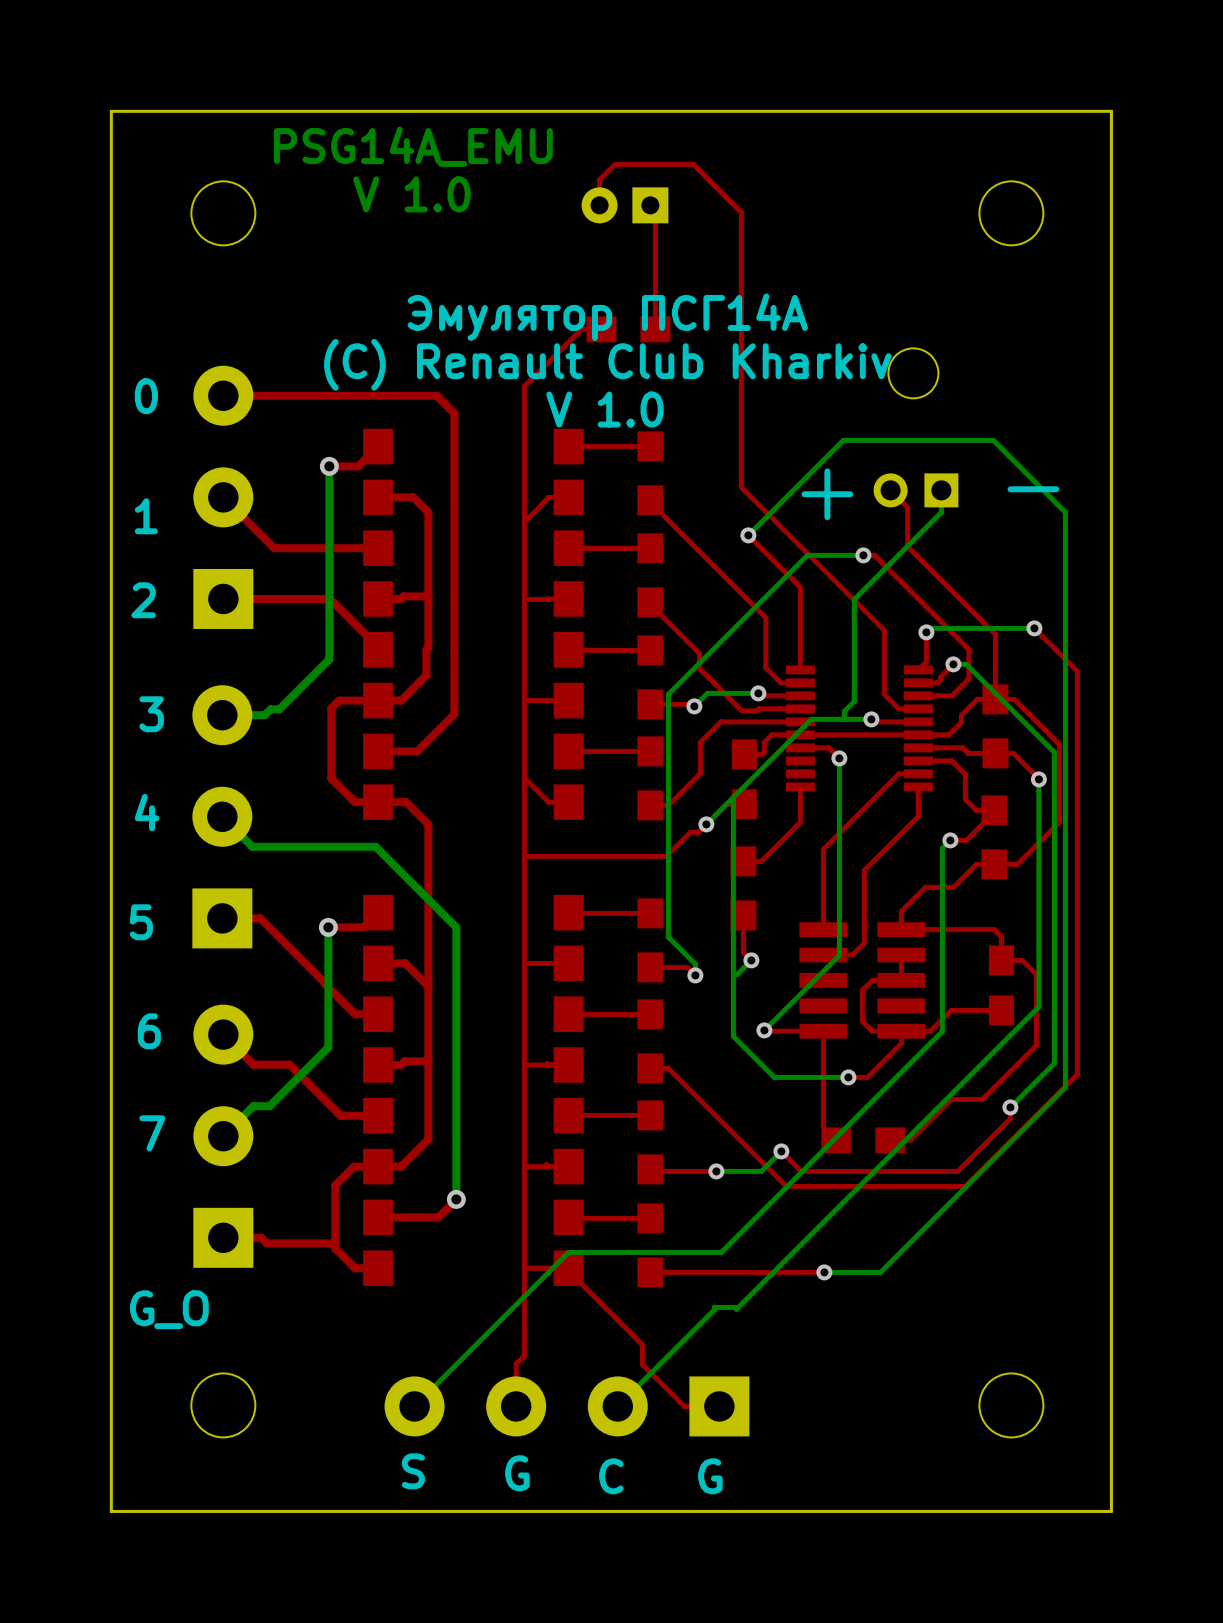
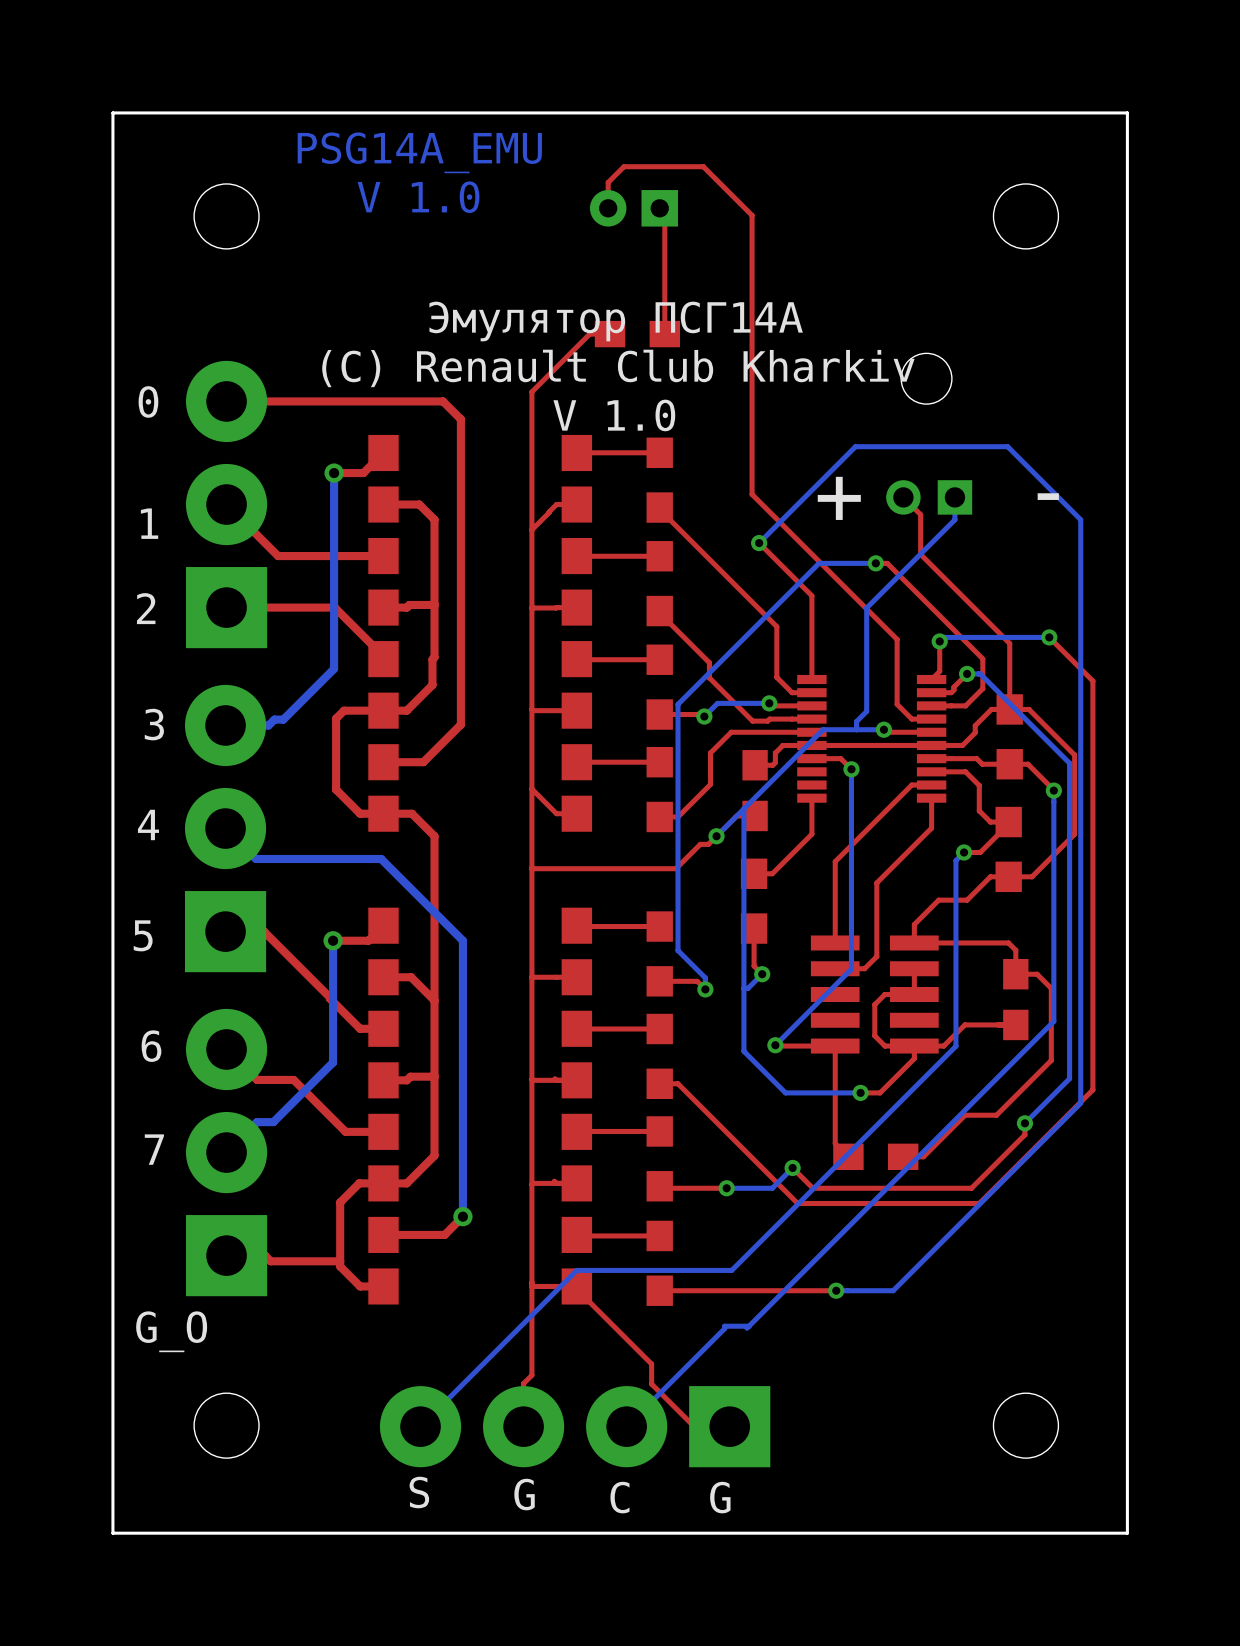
part footprint: [193, 365, 254, 629] -> [185, 360, 268, 649]
part footprint: [192, 685, 253, 949] -> [184, 684, 267, 973]
part footprint: [193, 1004, 254, 1268] -> [185, 1008, 268, 1297]
part footprint: [384, 1376, 750, 1437] -> [379, 1386, 771, 1468]

